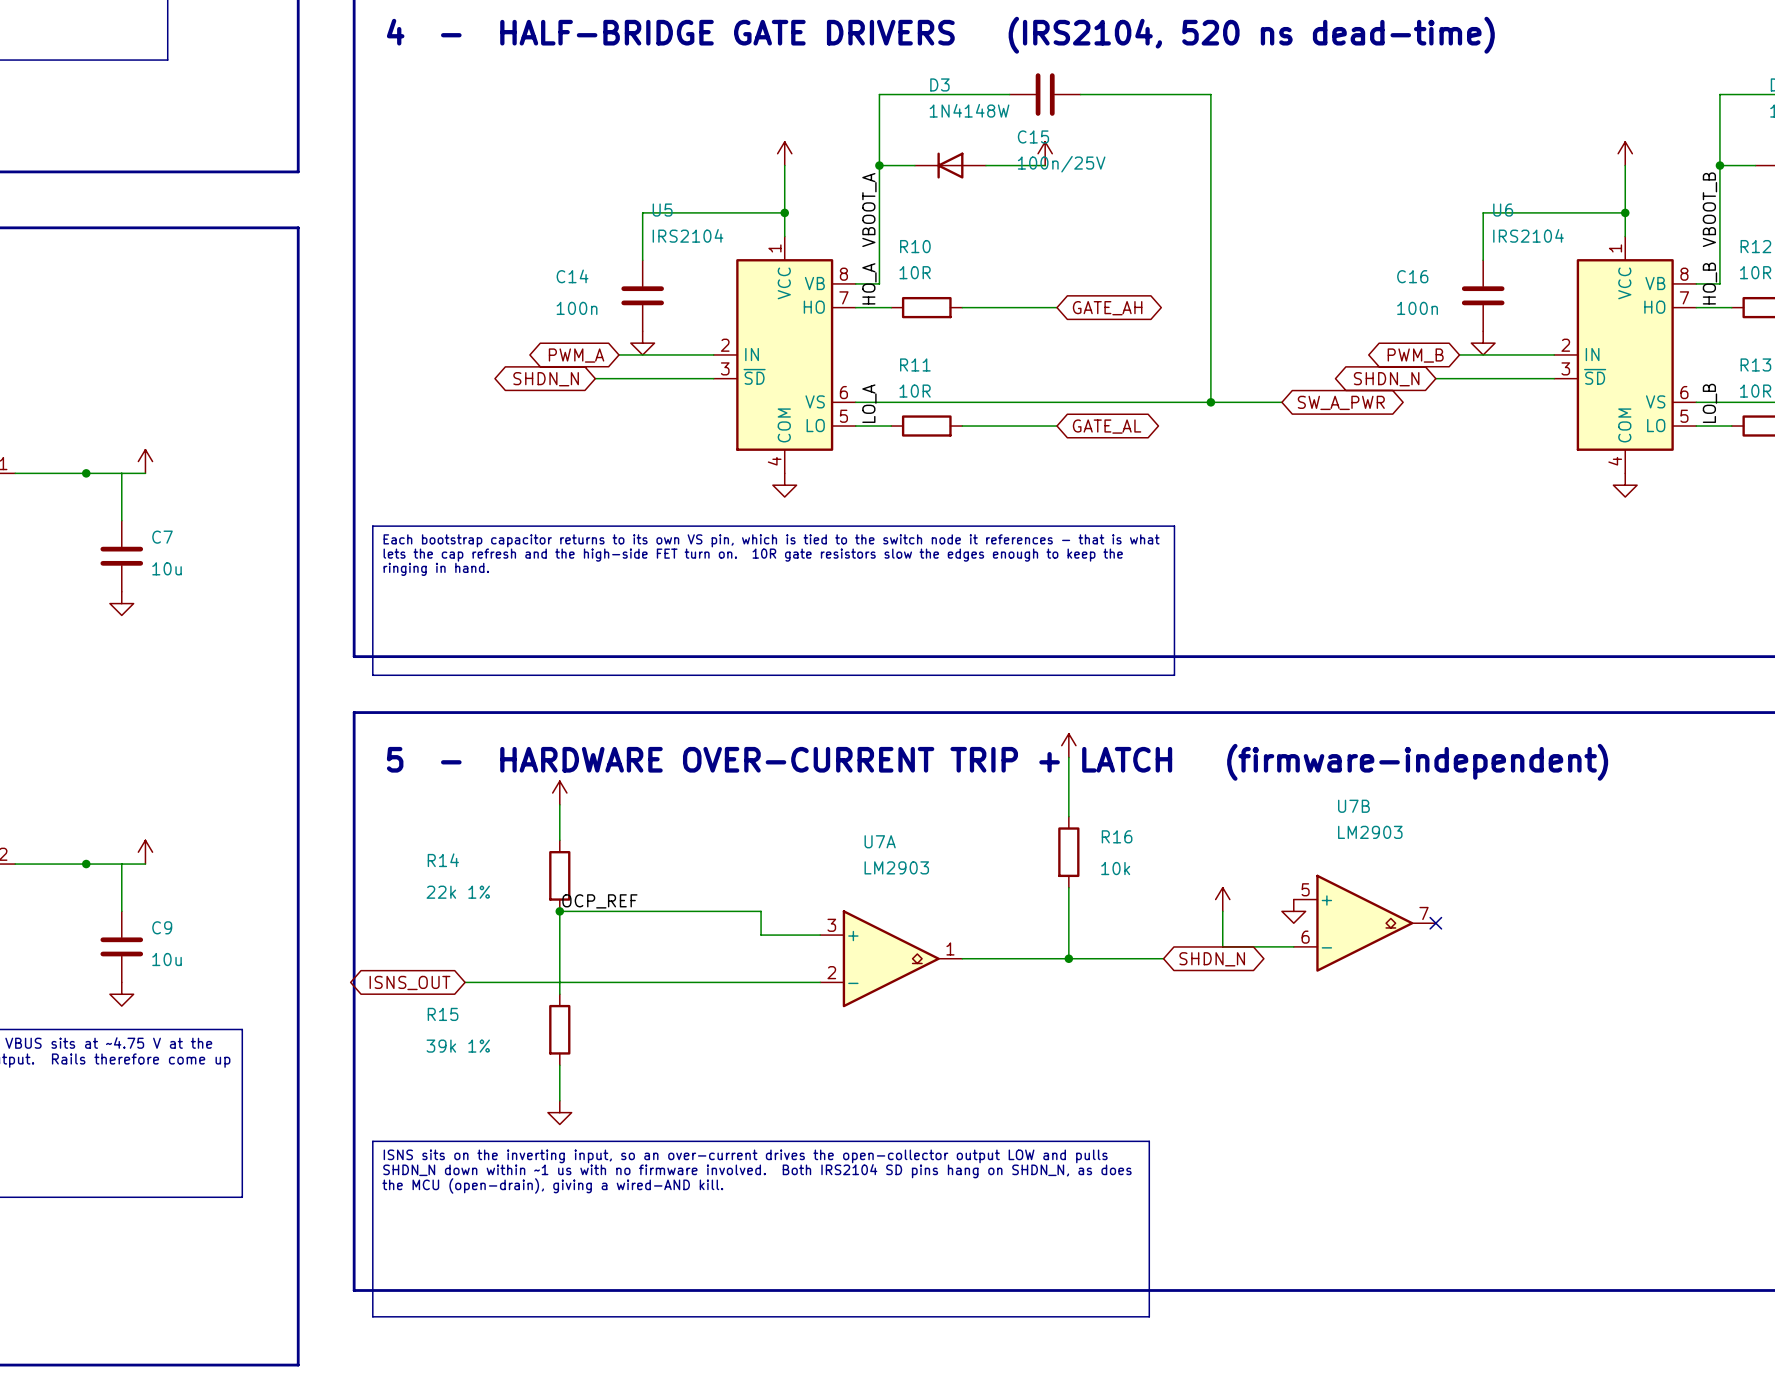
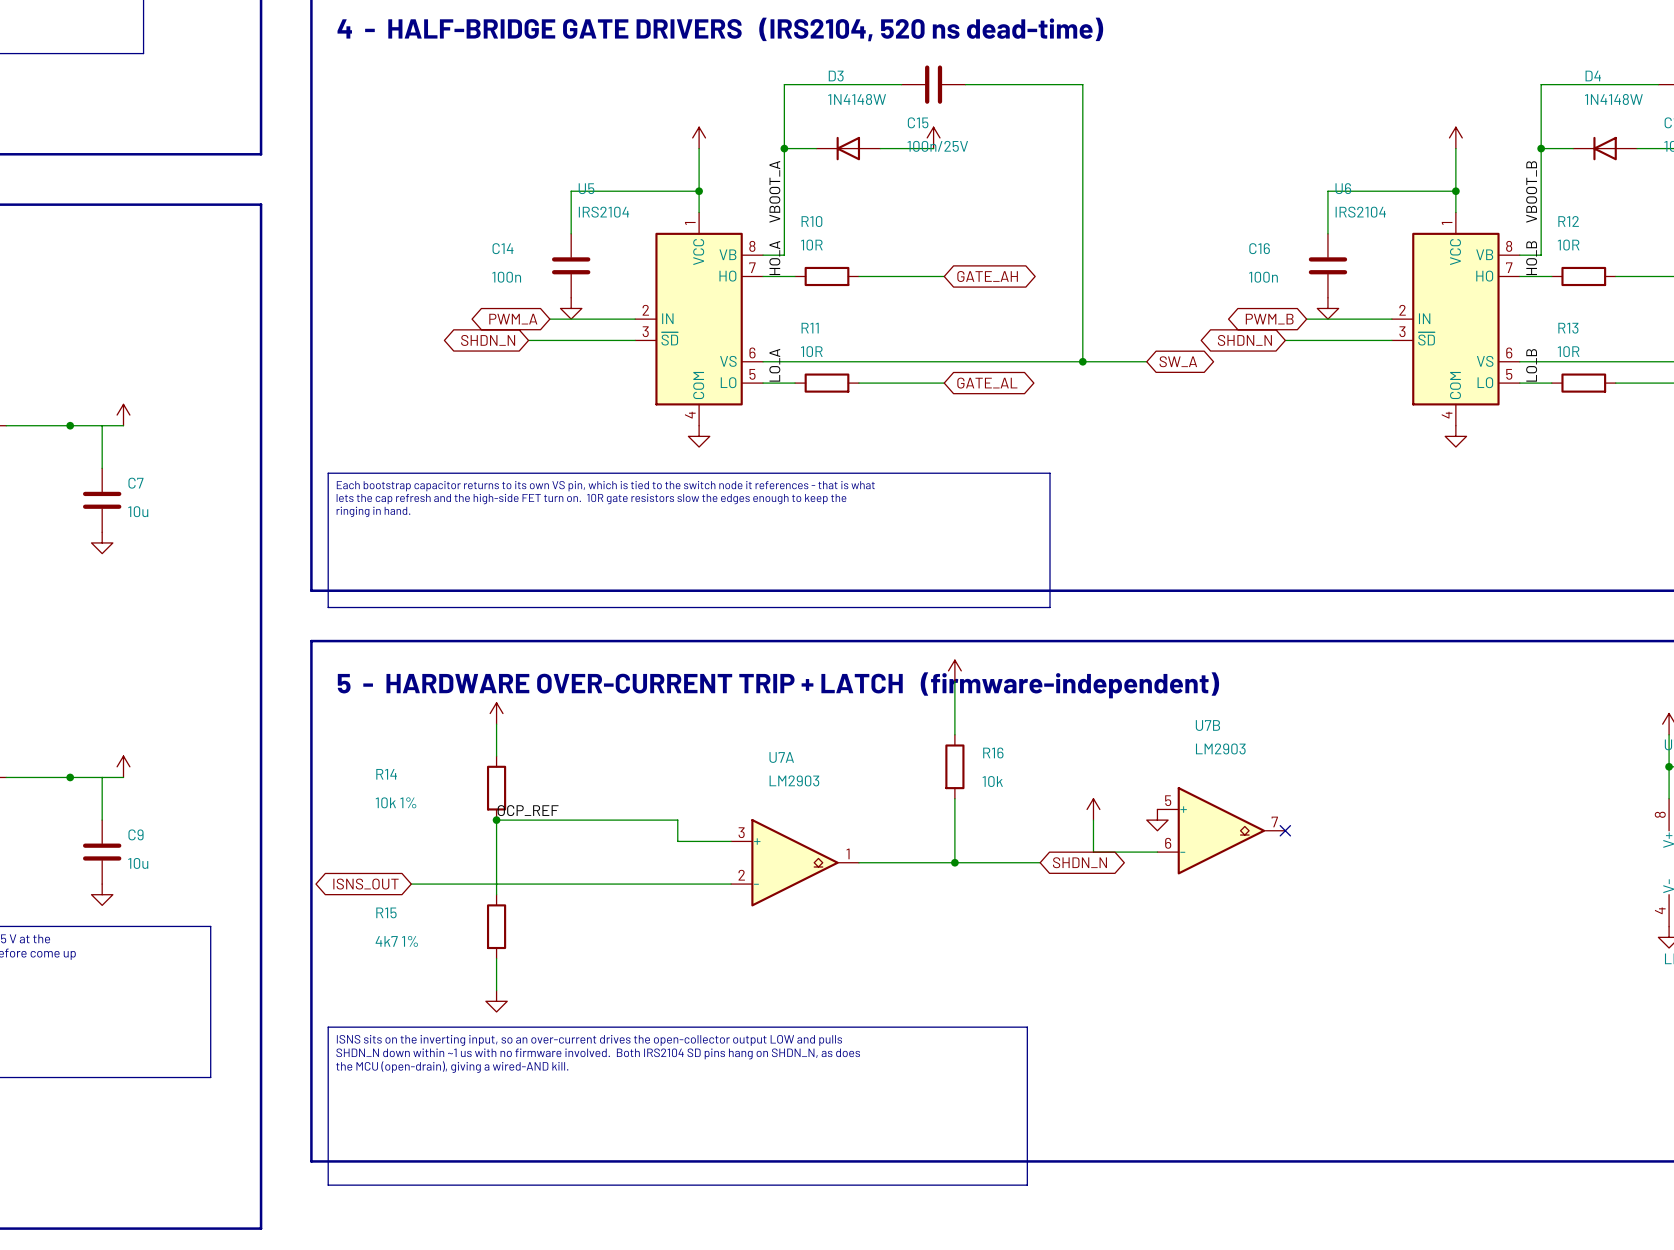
global label: SW_A_PWR (1341, 402) -> SW_A (1178, 361)
R14 value: 22k 1% (458, 892) -> 10k 1% (396, 802)
R15 value: 39k 1% (458, 1046) -> 4k7 1% (396, 941)

